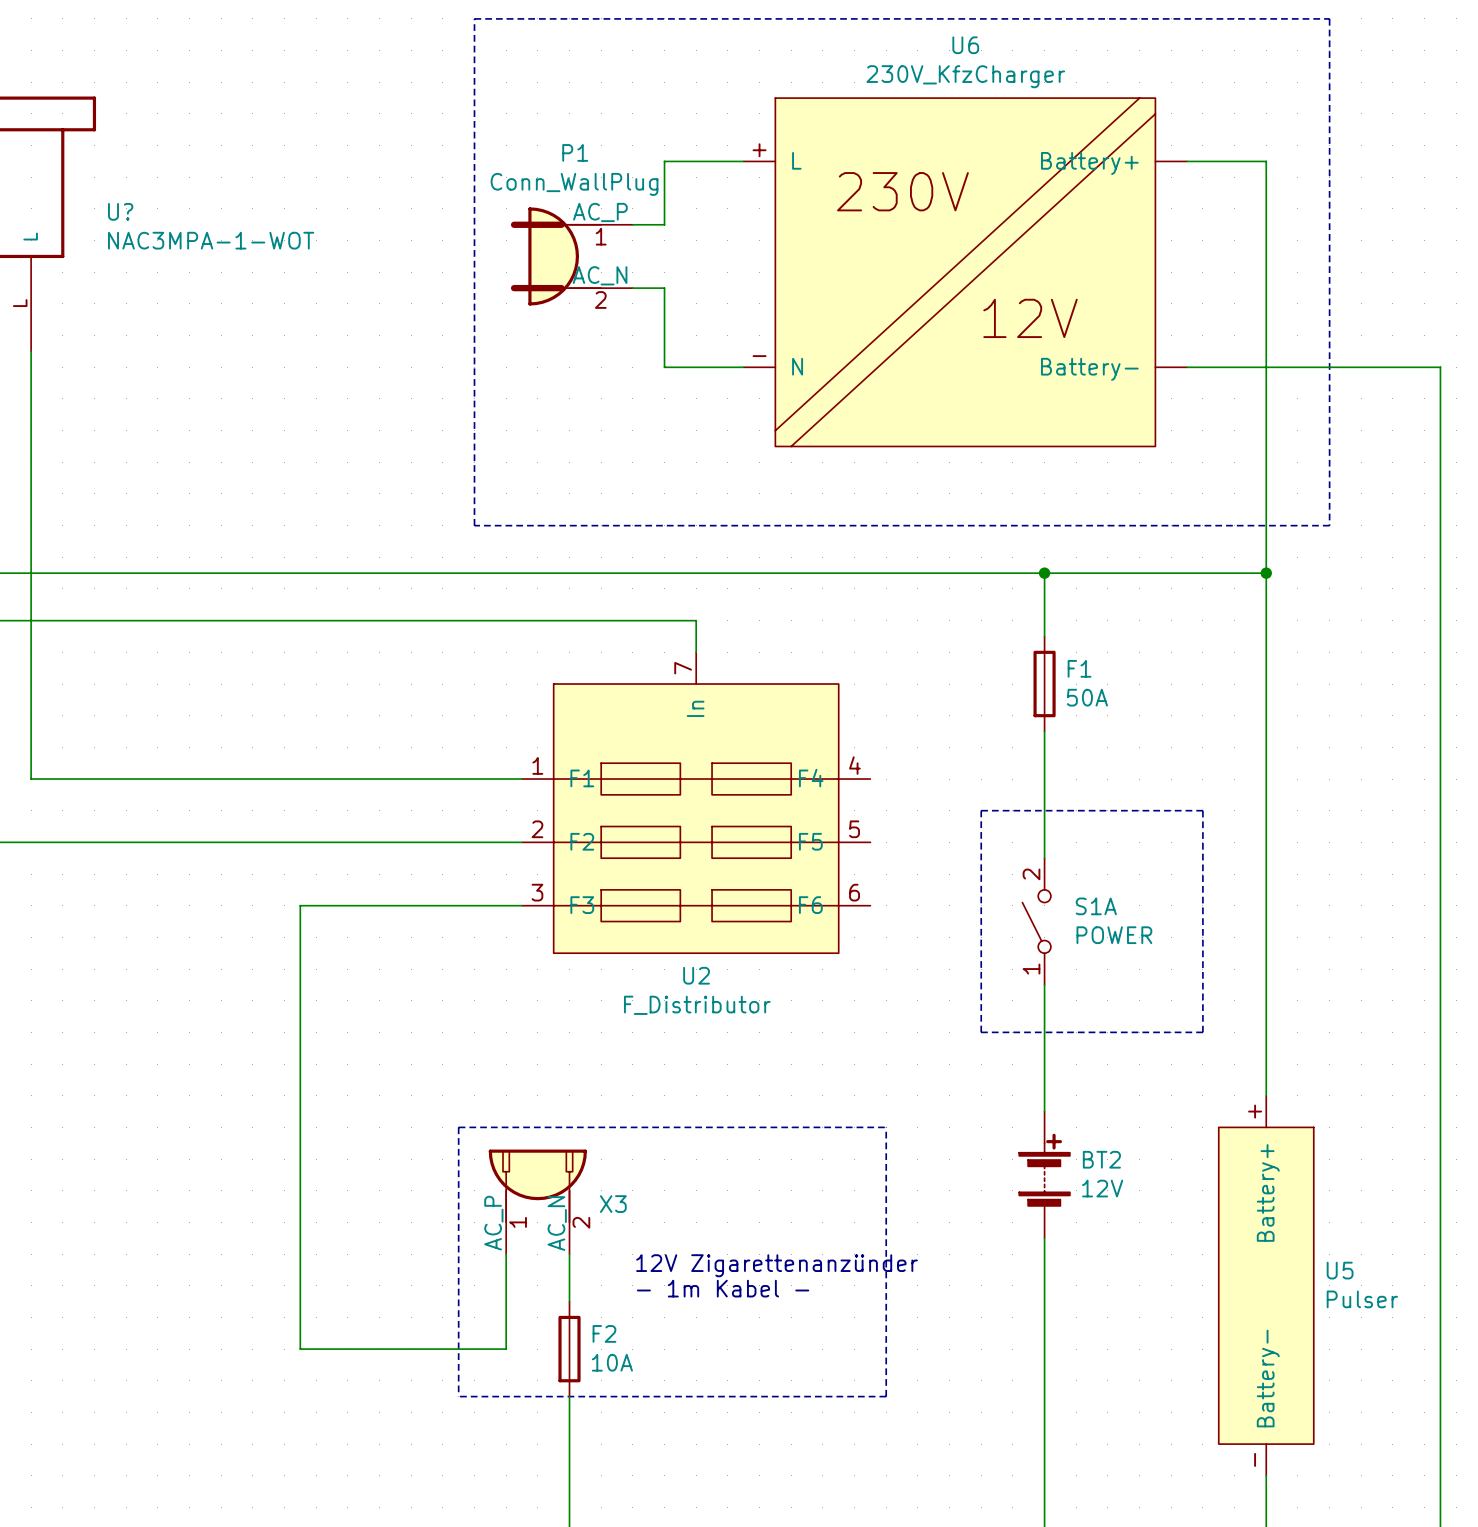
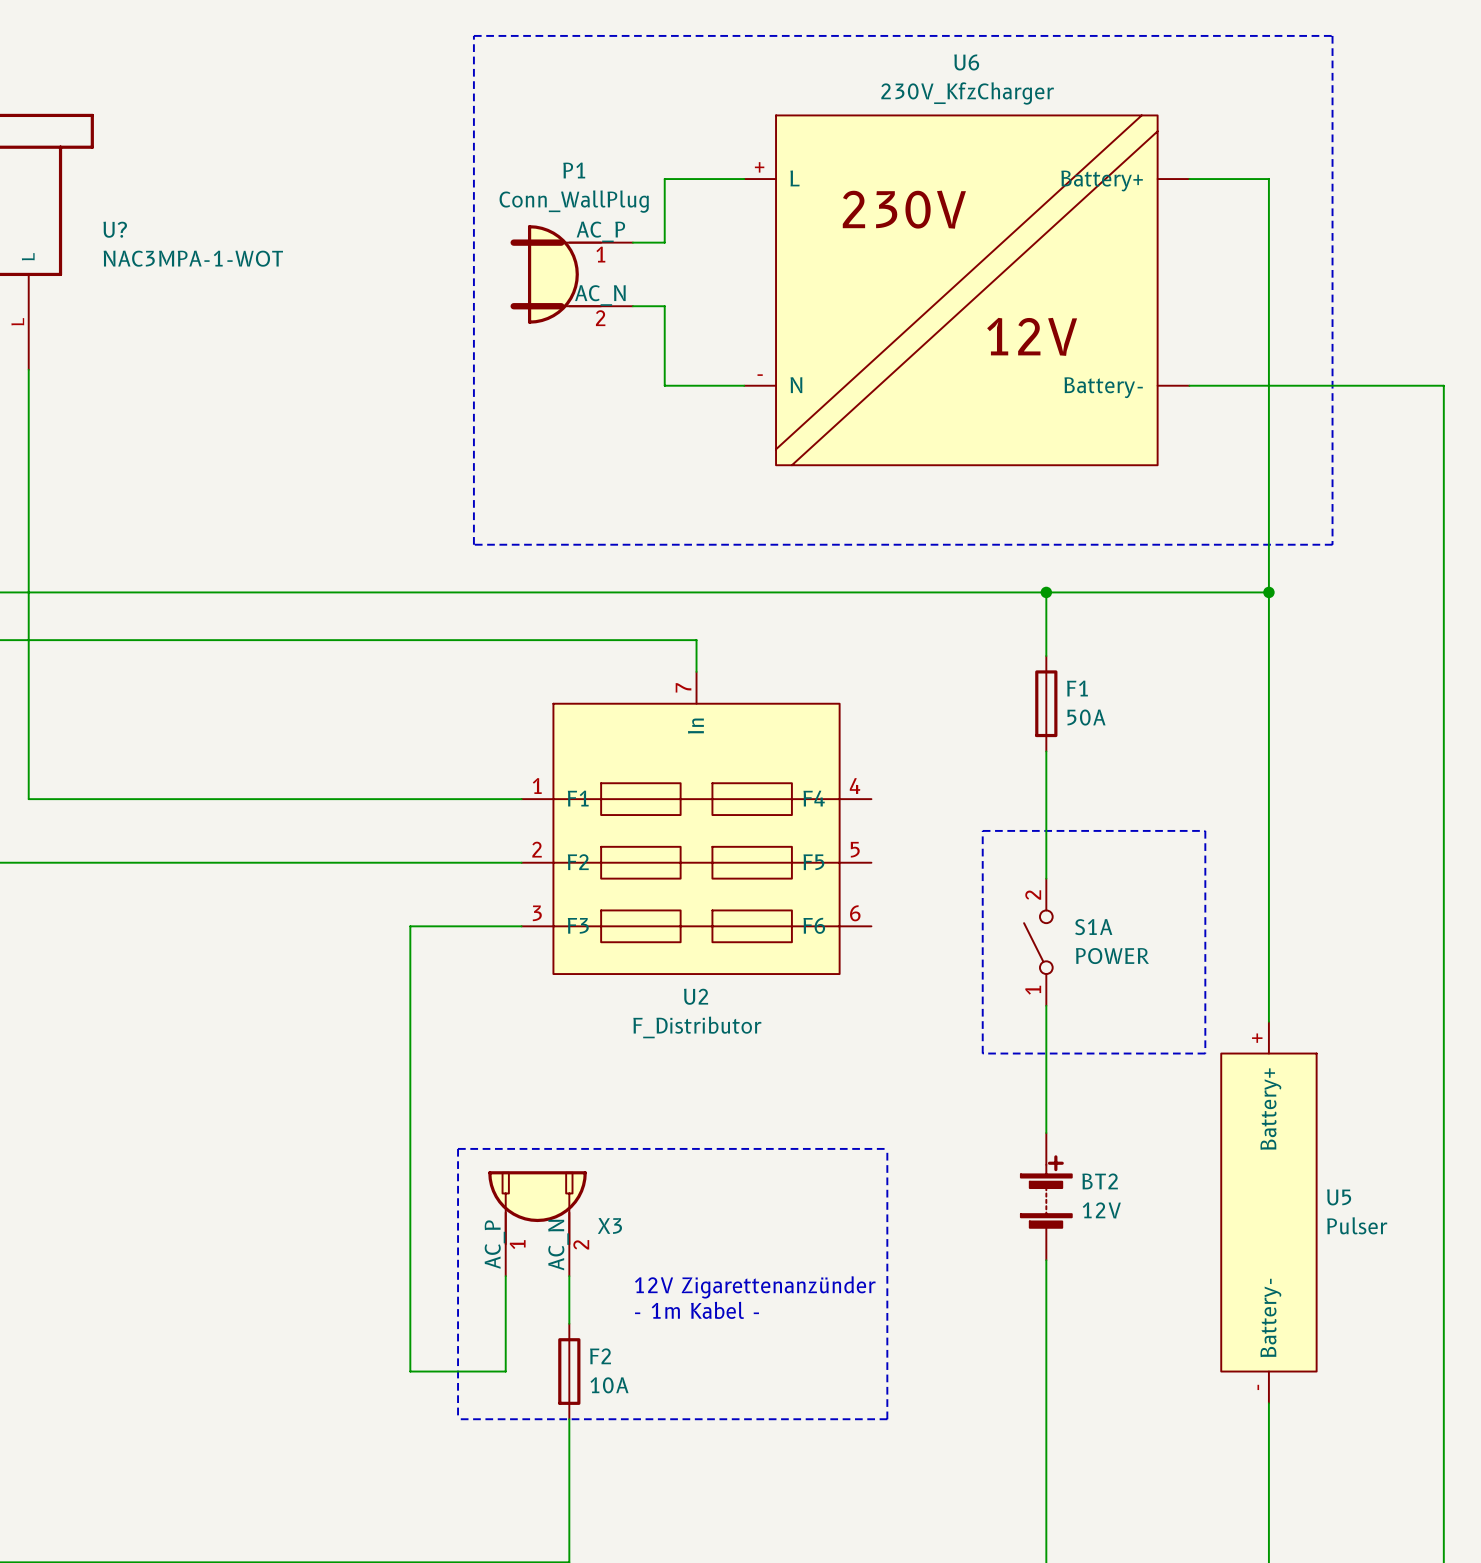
wire: (411, 905) (300, 905) (300, 1349) (411, 1349) -> (410, 926) (410, 1371)
U5 position: (1266, 1285) -> (1268, 1212)

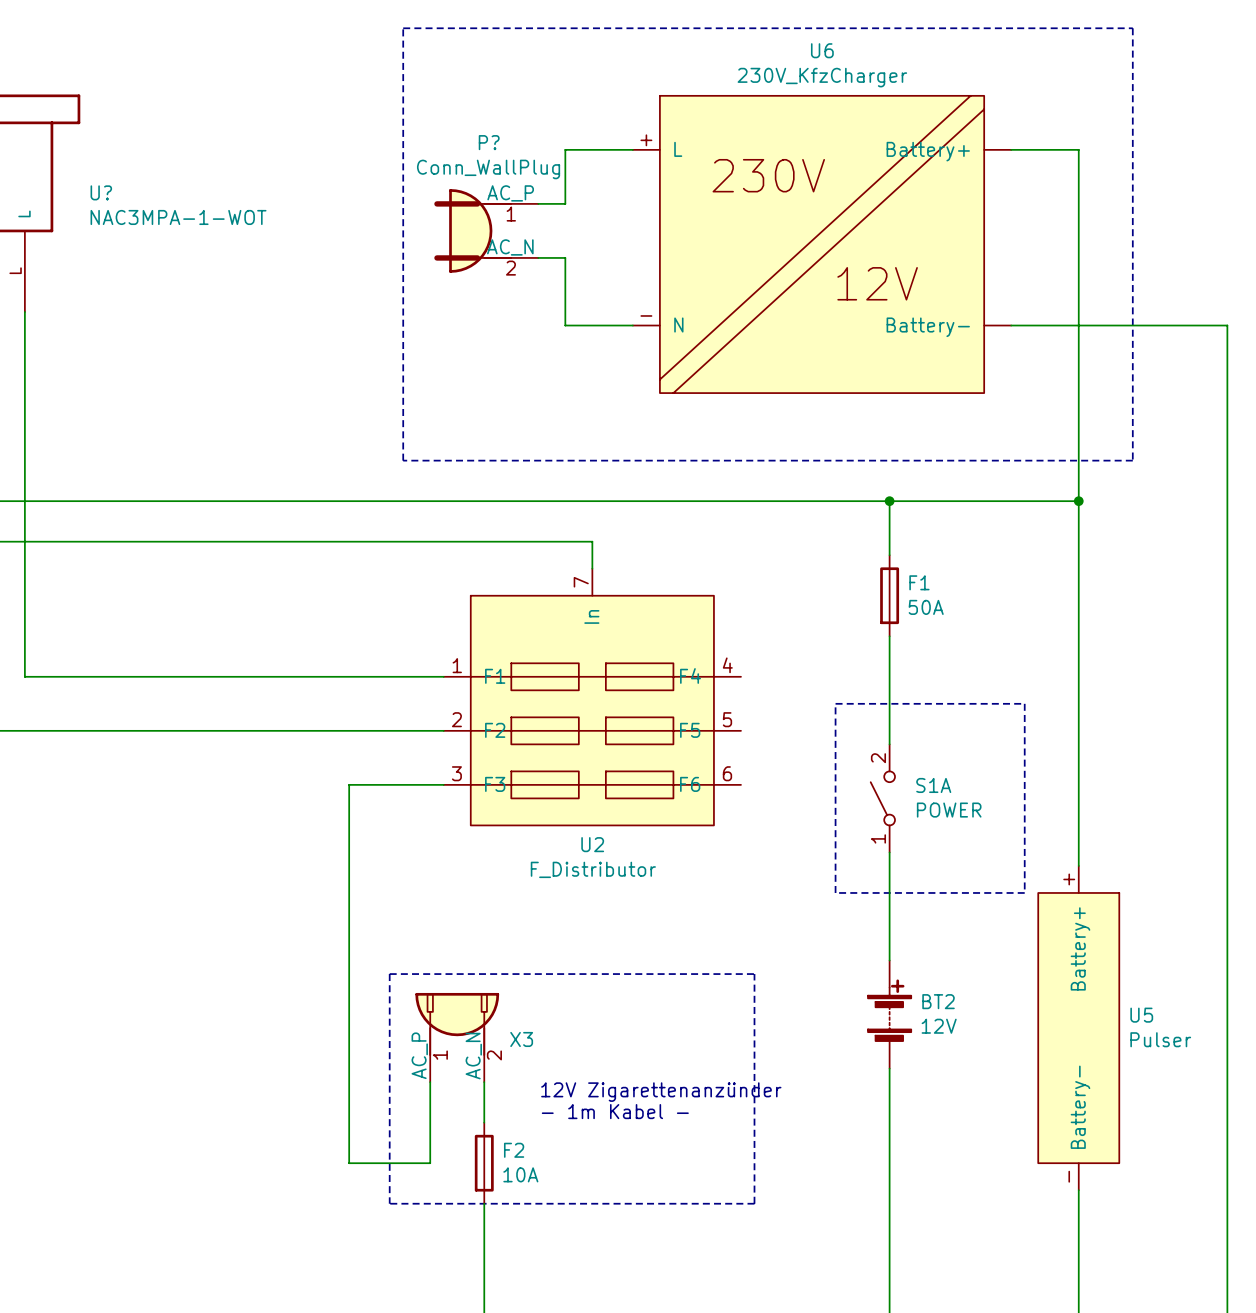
P1 name: P1 (574, 170) -> P? (489, 142)

